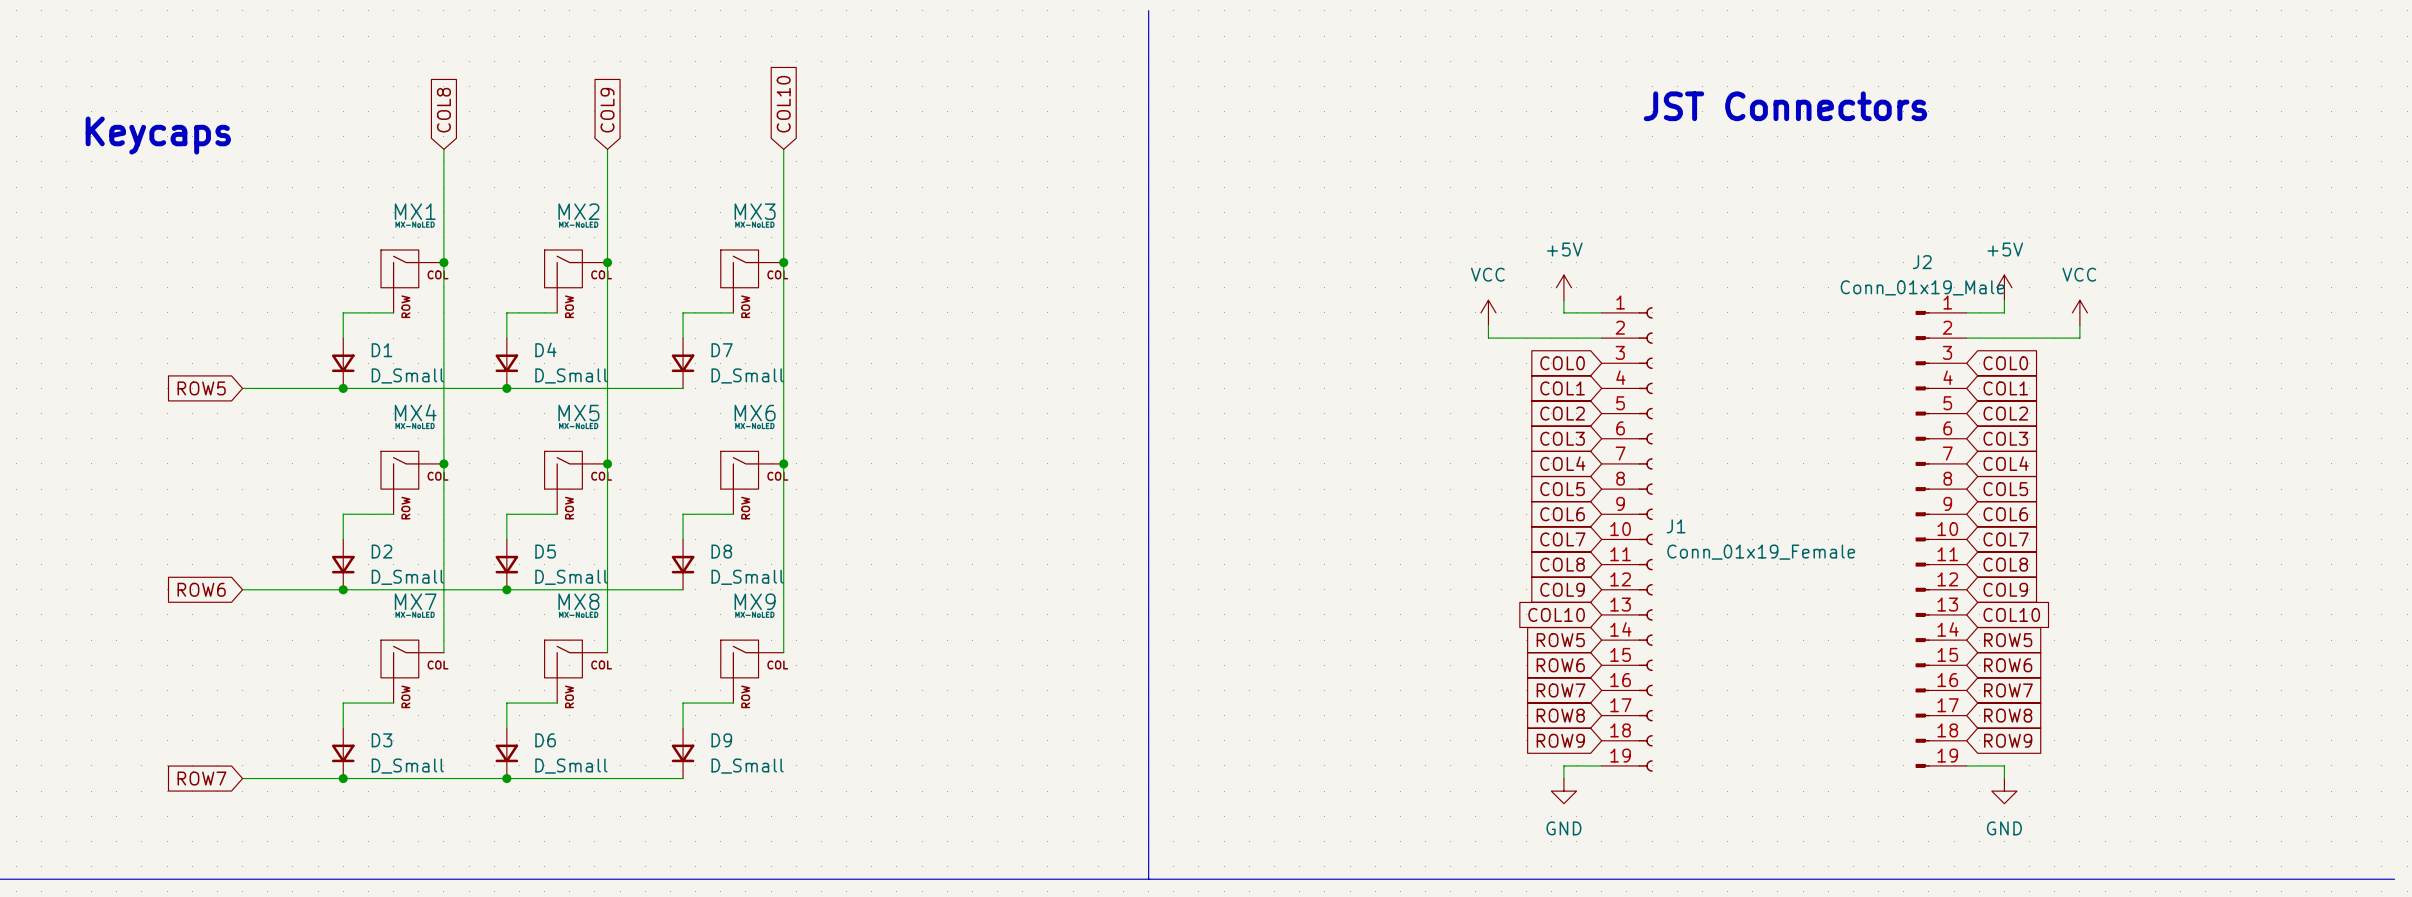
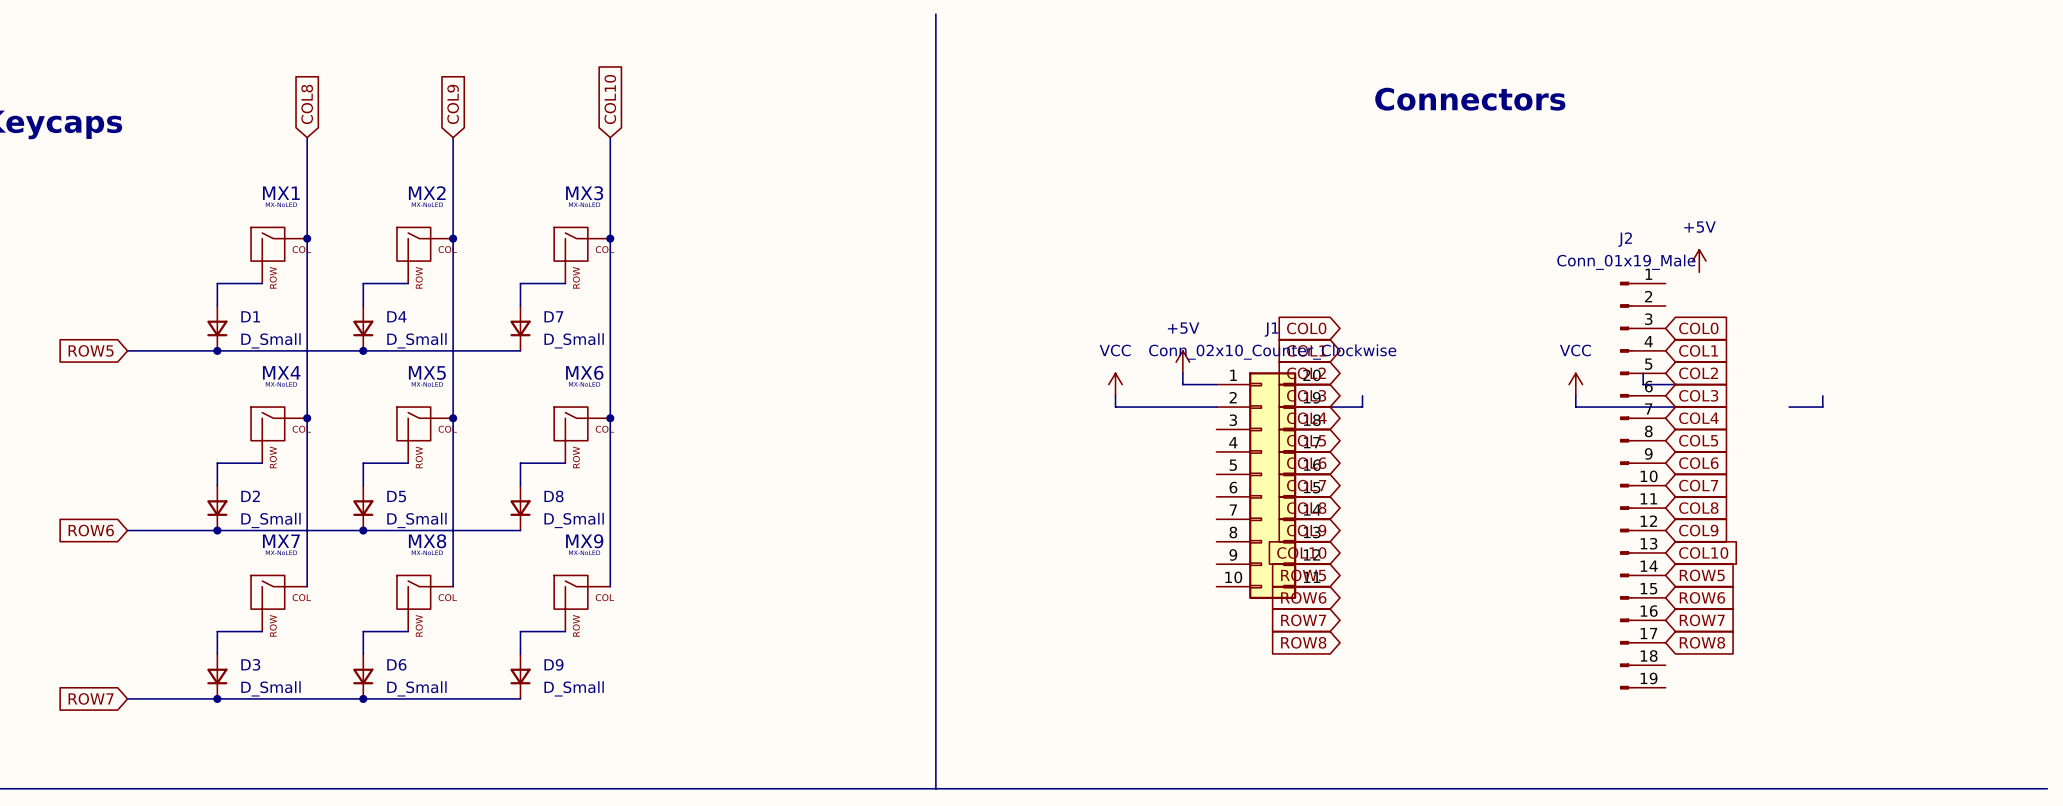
text: JST Connectors (1785, 106) -> Connectors (1470, 99)
power symbol position: +5V (1563, 287) -> +5V (1182, 362)
wire: (1563, 300) (1563, 312) (1601, 312) -> (1182, 373) (1182, 384) (1216, 384)
wire: (2004, 300) (2004, 312) (1966, 312) -> (1822, 395) (1822, 407) (1789, 407)
J1 symbol: [1601, 307, 1653, 772] -> [1216, 372, 1329, 600]
power symbol position: VCC (1488, 312) -> VCC (1115, 384)
power symbol: VCC (2079, 312) -> none
wire: (1488, 325) (1488, 338) (1601, 338) -> (1115, 395) (1115, 407) (1216, 407)
wire: (2079, 325) (2079, 338) (1966, 338) -> none
wire: none -> (1643, 373) (1643, 384) (1676, 384)
power symbol: none -> VCC (1575, 384)
wire: none -> (1362, 395) (1362, 407) (1328, 407)
wire: none -> (1575, 395) (1575, 407) (1676, 407)
J1 name position: J1 (1676, 526) -> J1 (1271, 329)
J1 value: Conn_01x19_Female (1761, 552) -> Conn_02x10_Counter_Clockwise (1272, 352)
global label: ROW9 (1560, 740) -> none
global label: ROW9 (2008, 740) -> none
wire: (1601, 765) (1563, 765) (1563, 778) -> none
wire: (1966, 765) (2004, 765) (2004, 778) -> none
power symbol: GND (1563, 791) -> none
power symbol: GND (2004, 791) -> none

